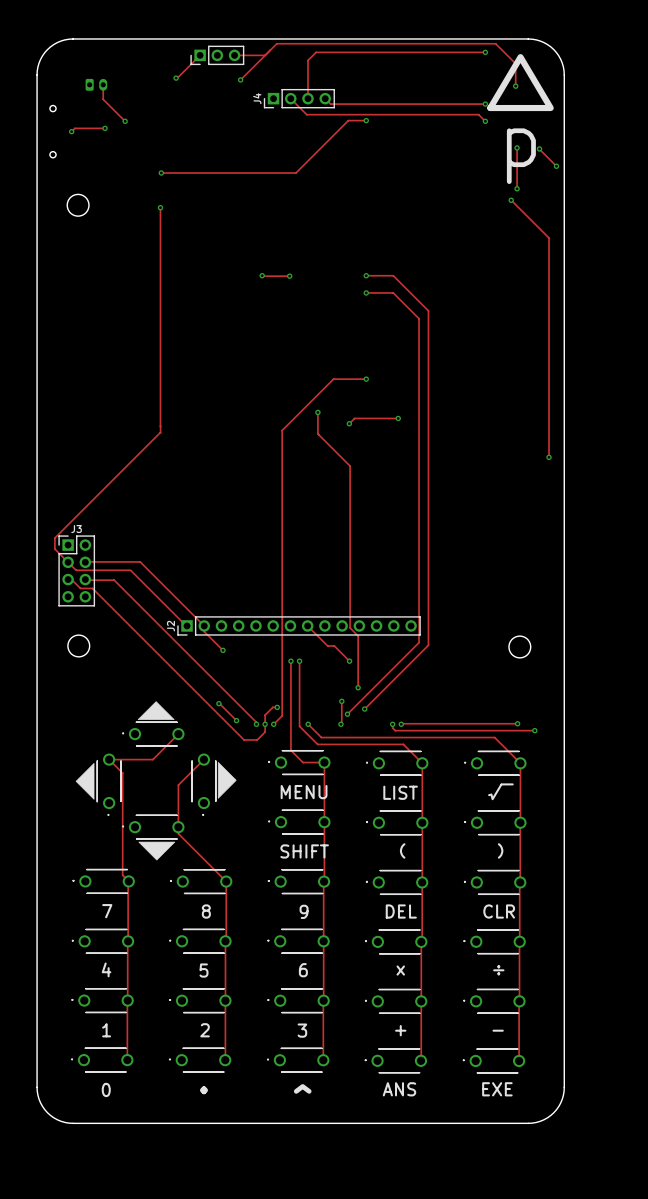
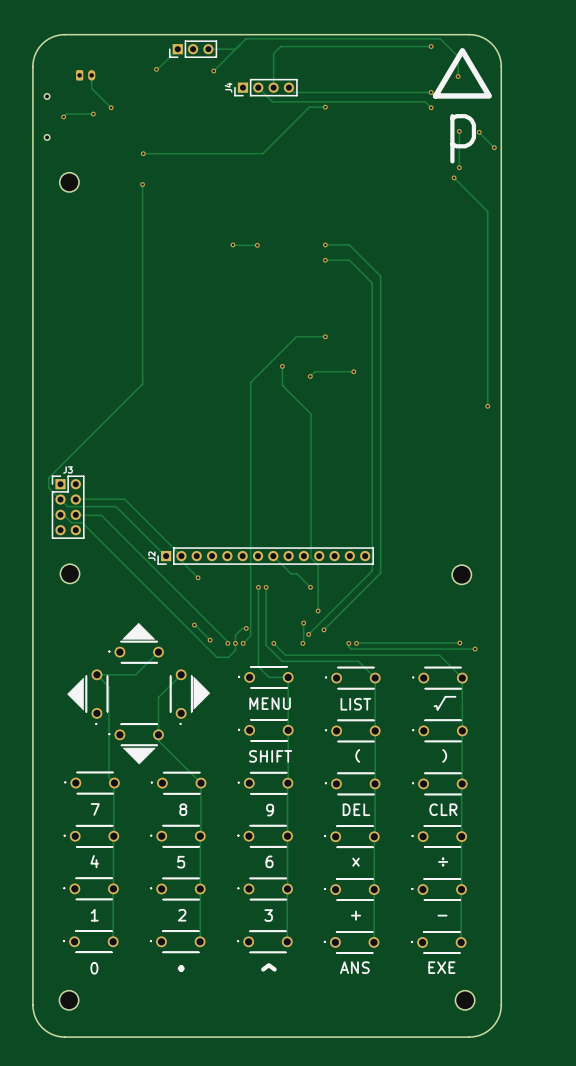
board edge: (37, 1087) (39, 1099) (47, 1112) (57, 1119) (73, 1123) (532, 1123) (547, 1117) (556, 1109) (562, 1099) (564, 1087) -> (32, 965) (33, 1008) (36, 1019) (47, 1032) (64, 1037) (472, 1036) (489, 1030) (499, 1015) (501, 965)
part: none -> (69, 1000)
part: none -> (465, 1000)

